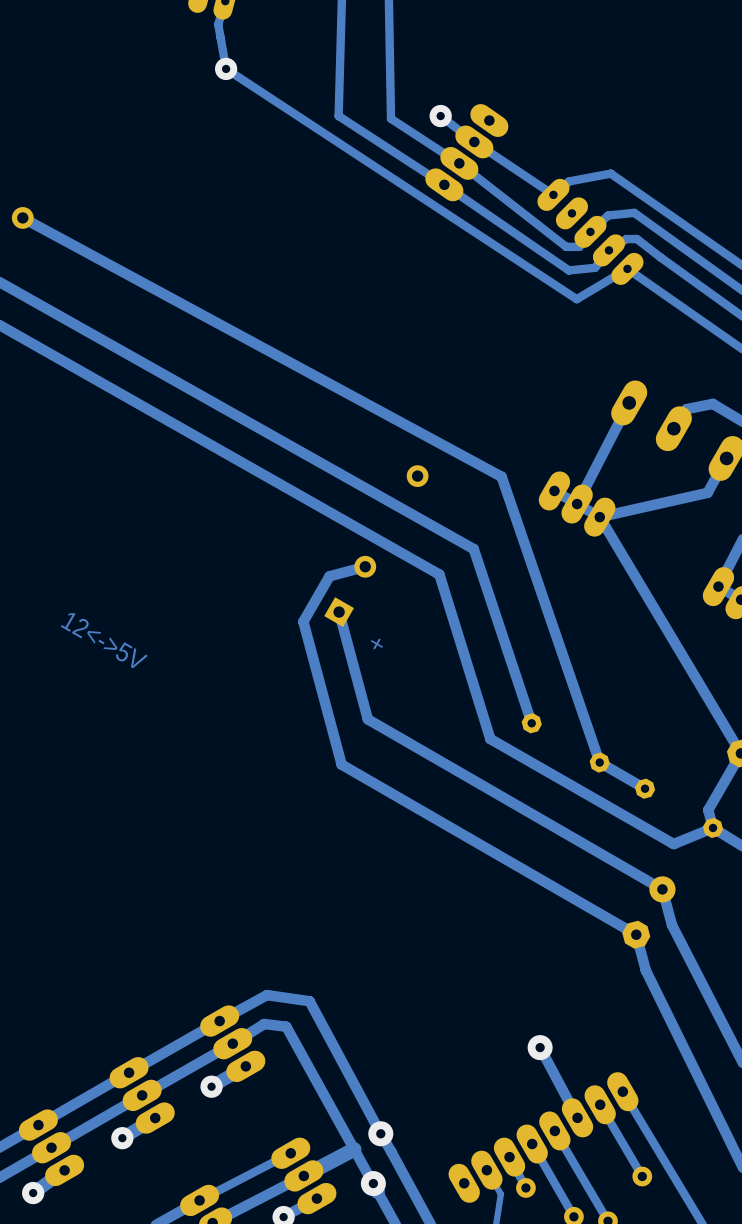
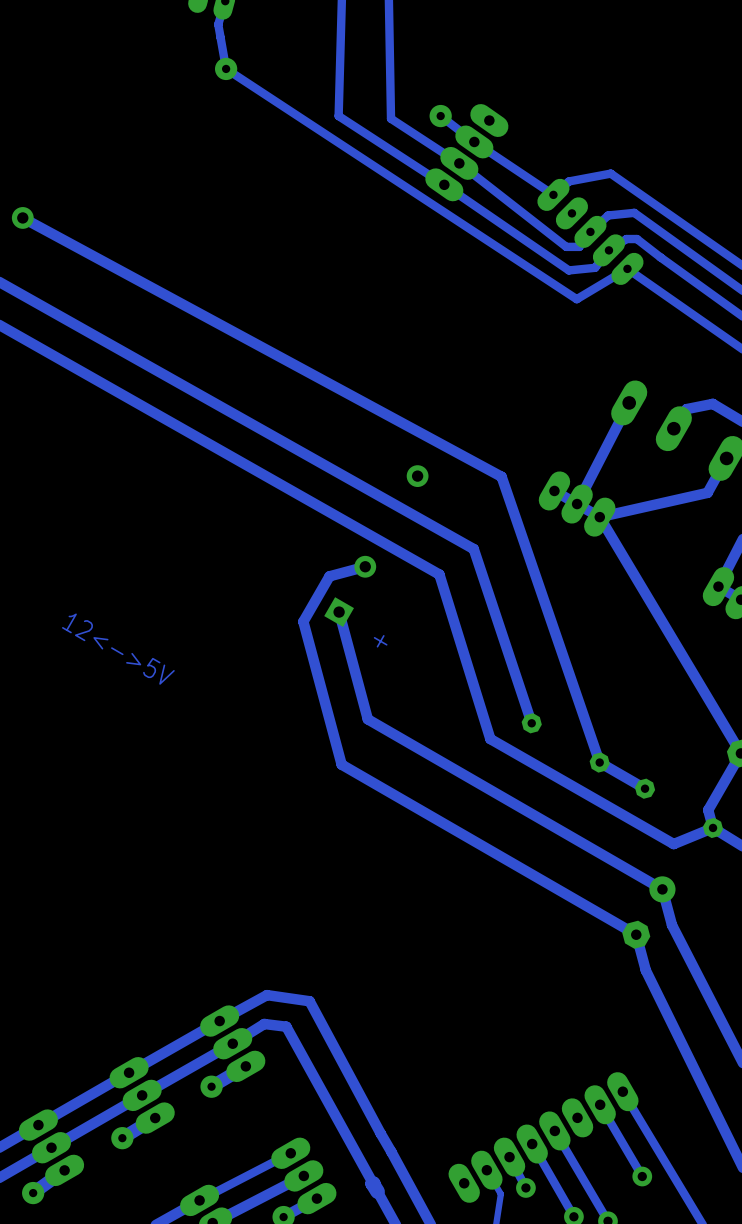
track: (540, 1047) (577, 1117) -> none
via: (540, 1047) -> none
via: (380, 1133) -> none
track: (354, 1149) (303, 1175) -> none
via: (373, 1183) -> none

